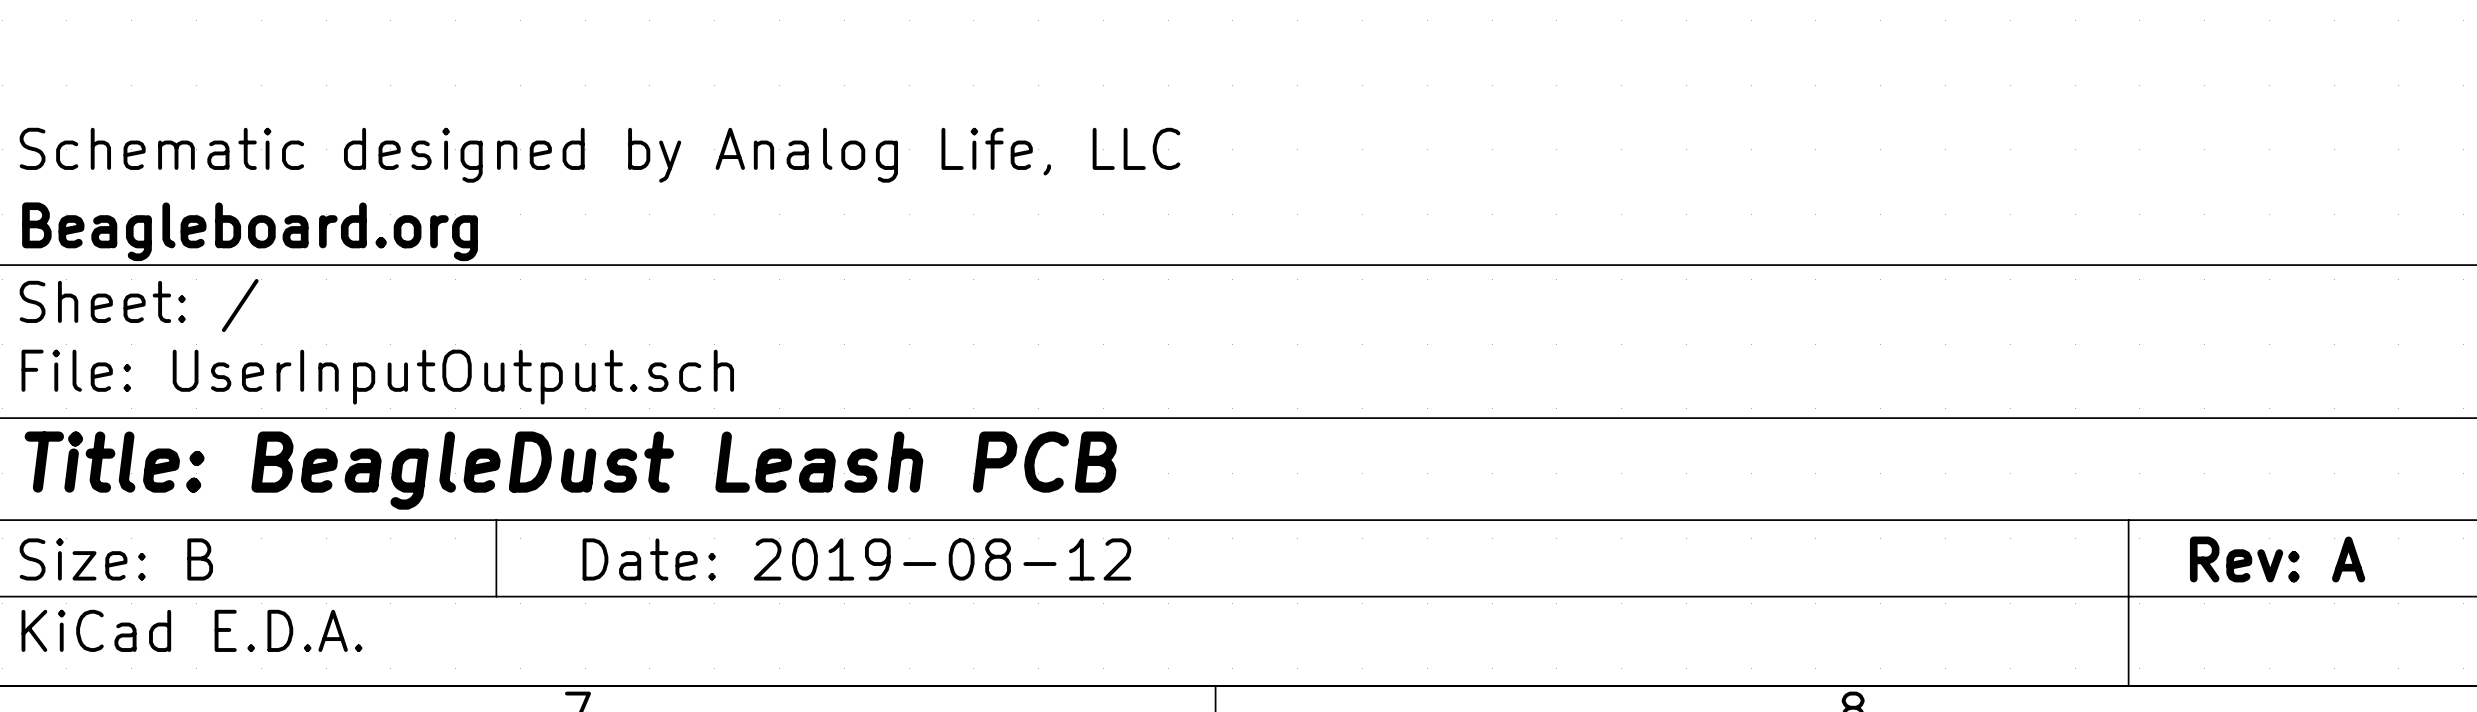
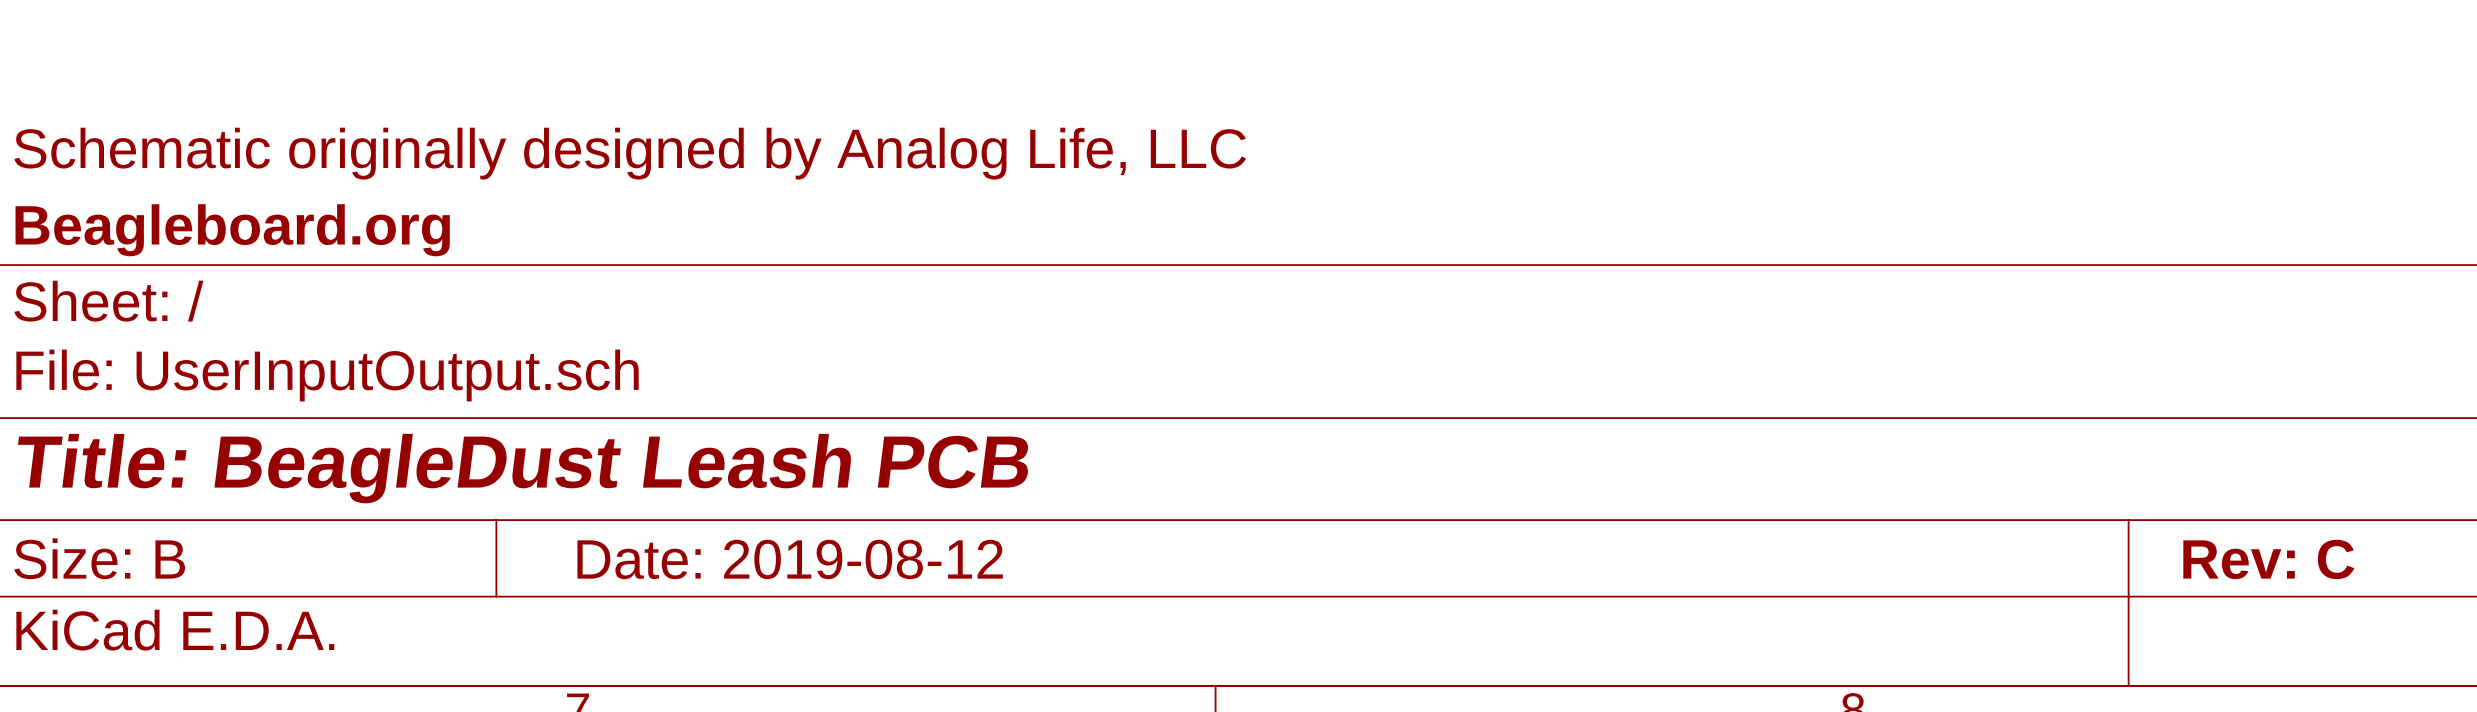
title block: Schematic designed by Analog Life, LLC (600, 155) -> Schematic originally designed by Analog Life, LLC (630, 153)
title block: Rev: A (2277, 559) -> Rev: C (2268, 559)

